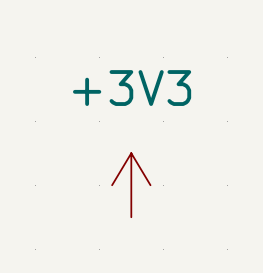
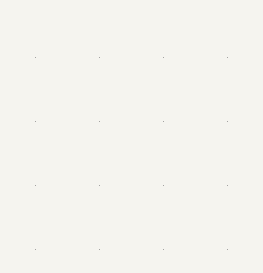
power symbol: +3V3 (131, 185) -> none

